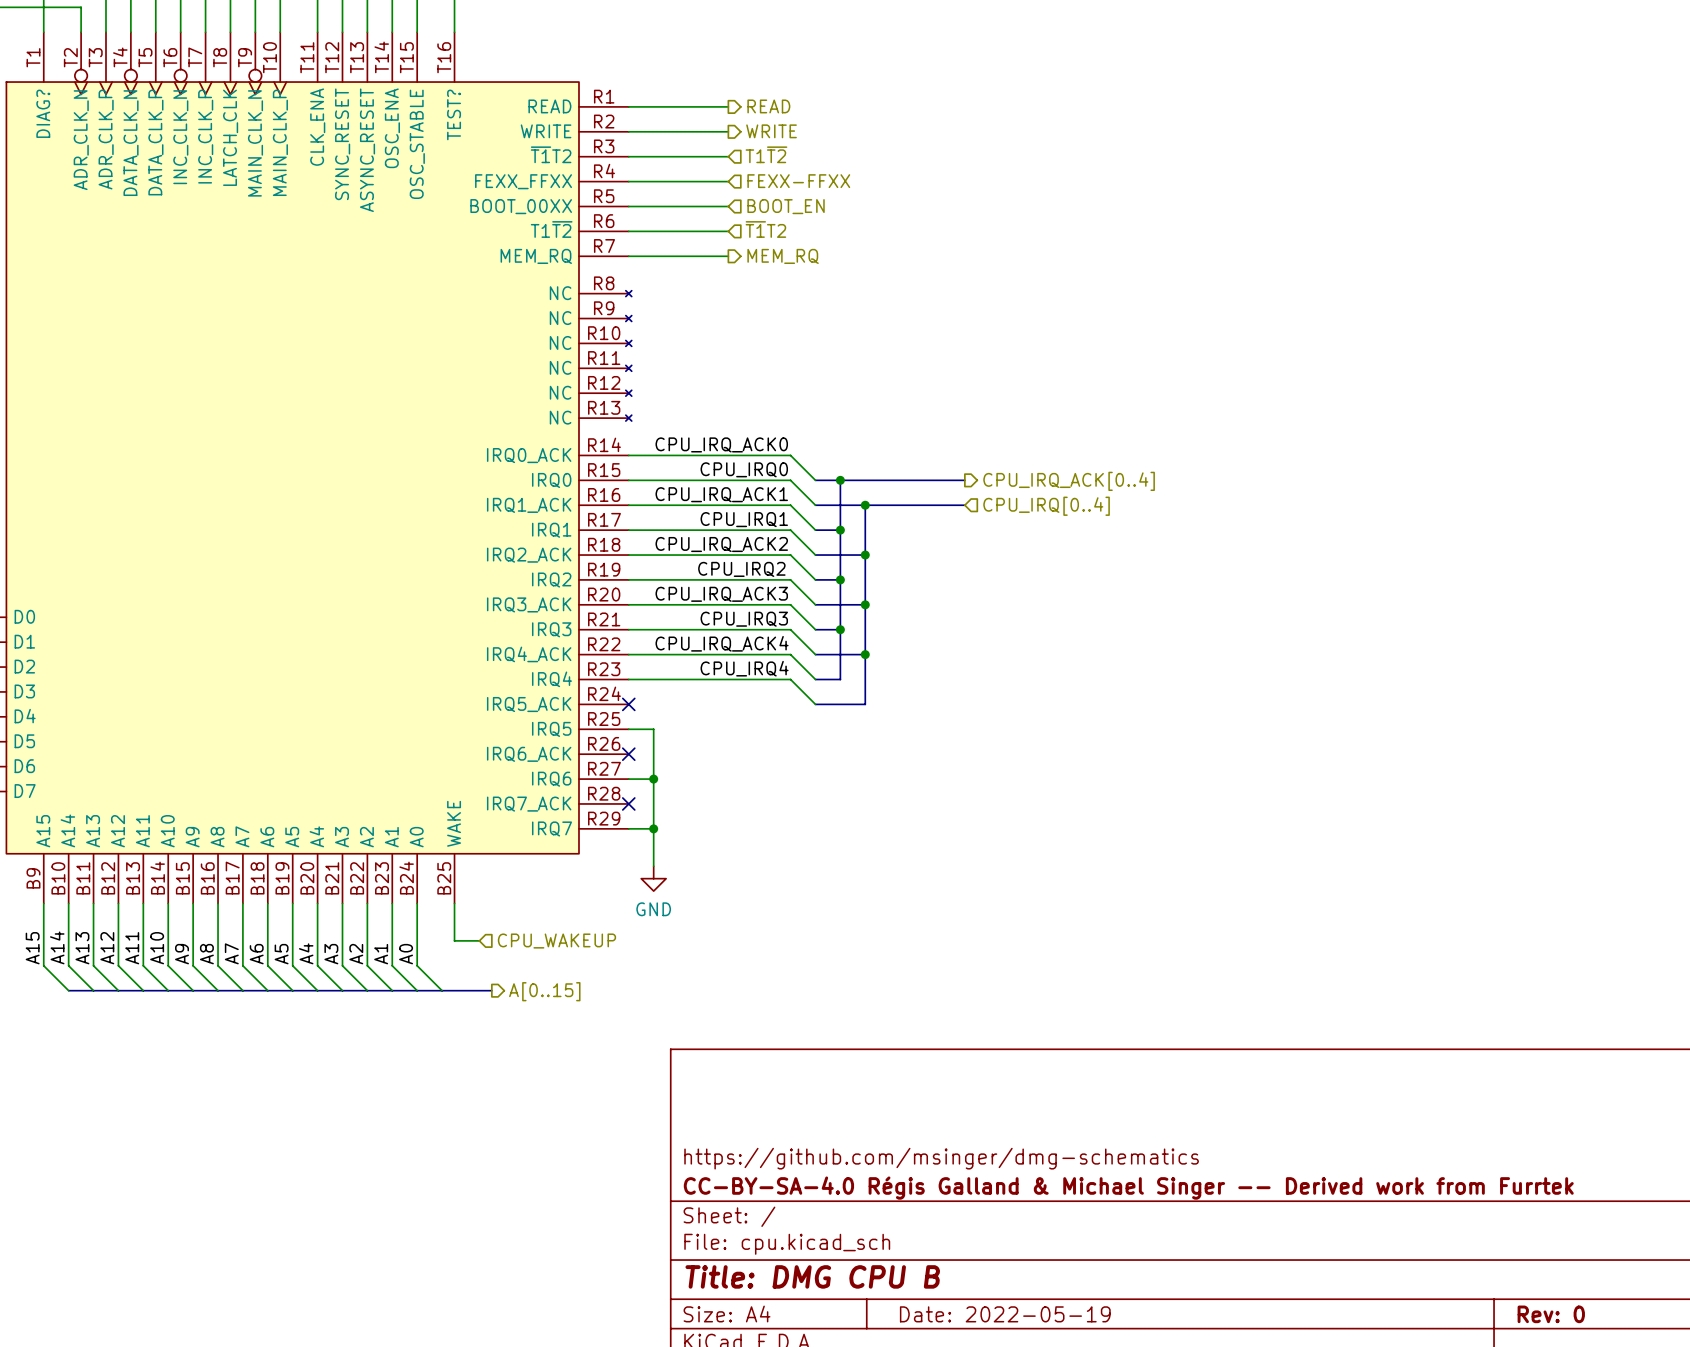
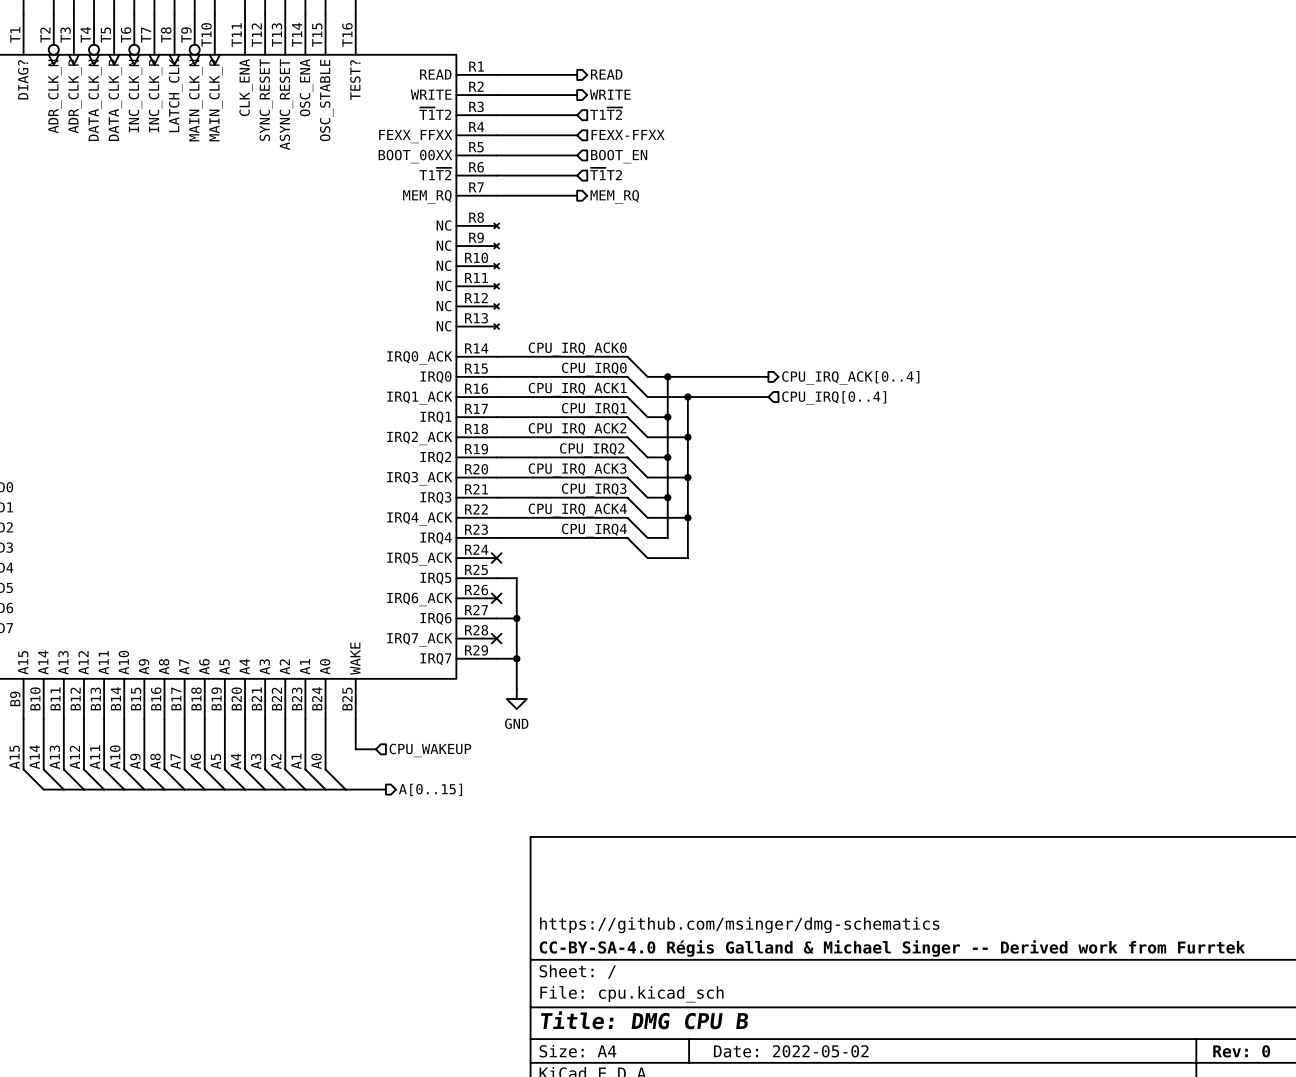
title block: Date: 2022-05-19 (1005, 1314) -> Date: 2022-05-02 (791, 1051)

